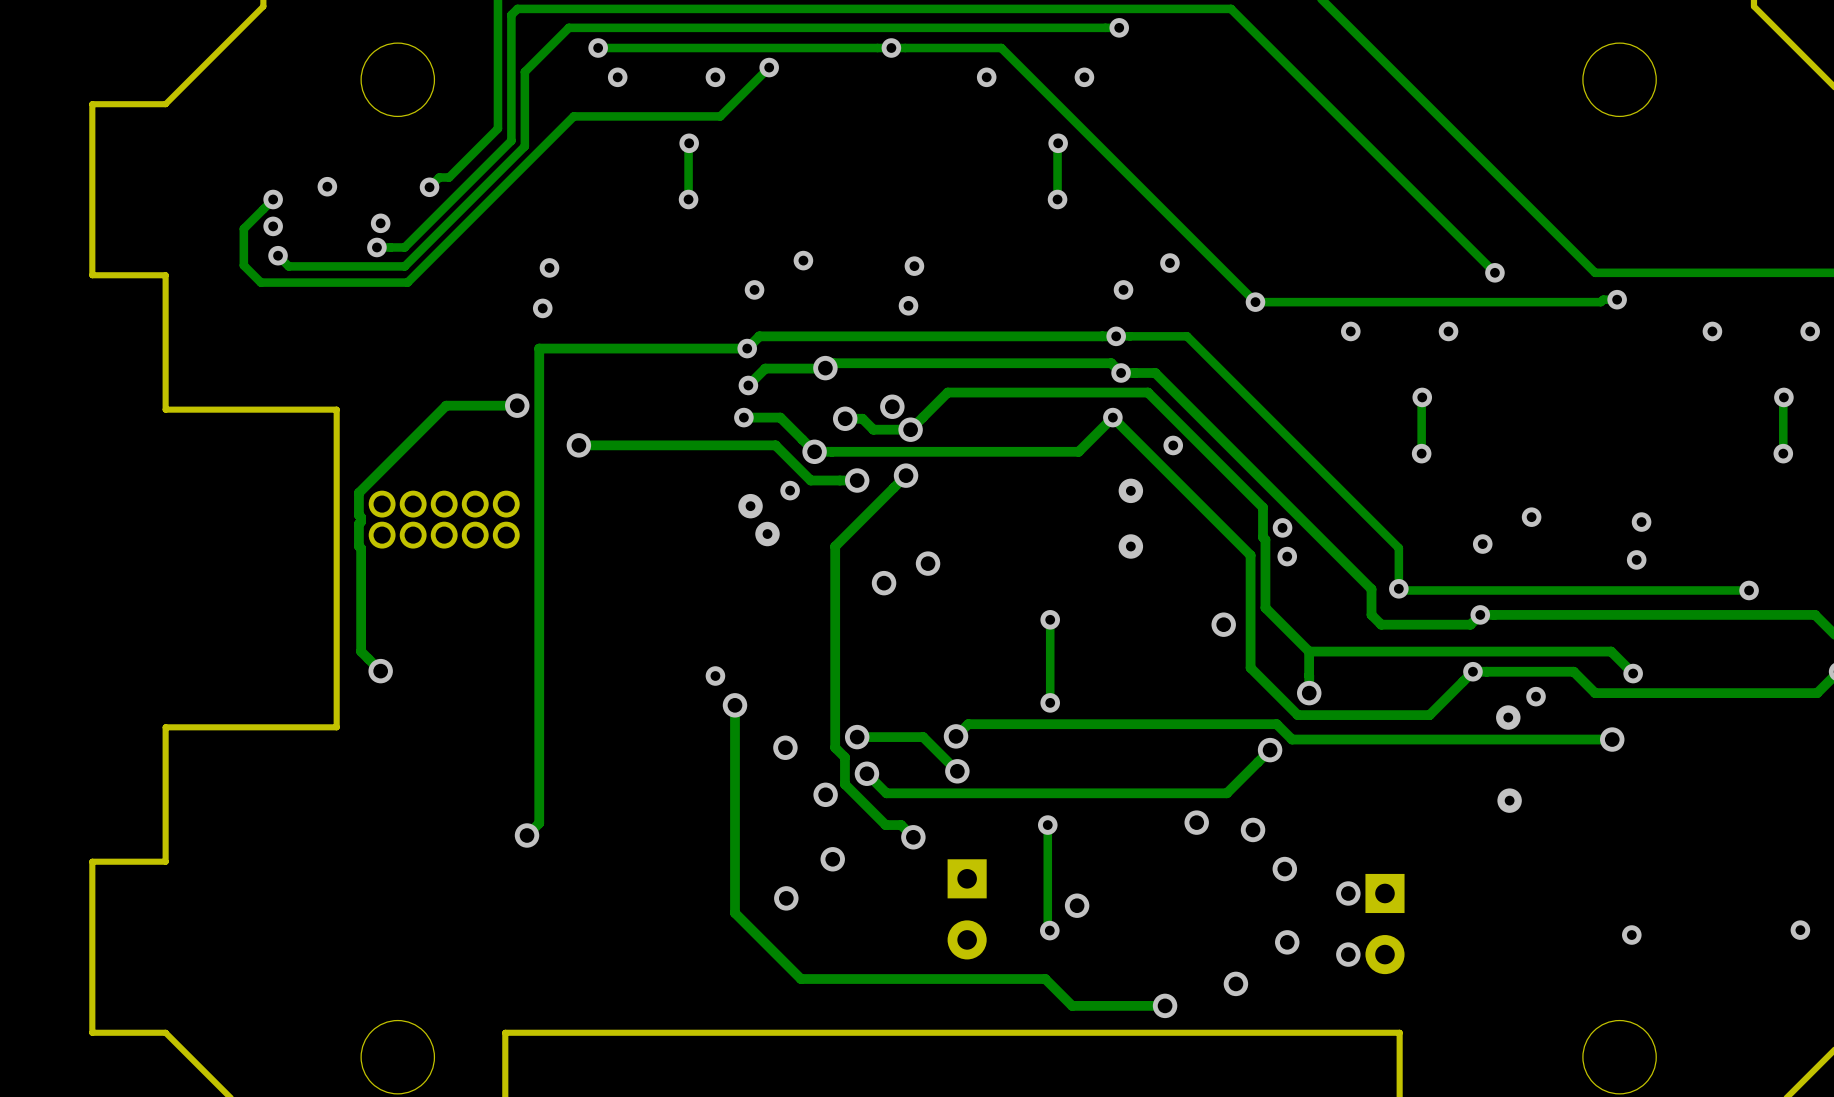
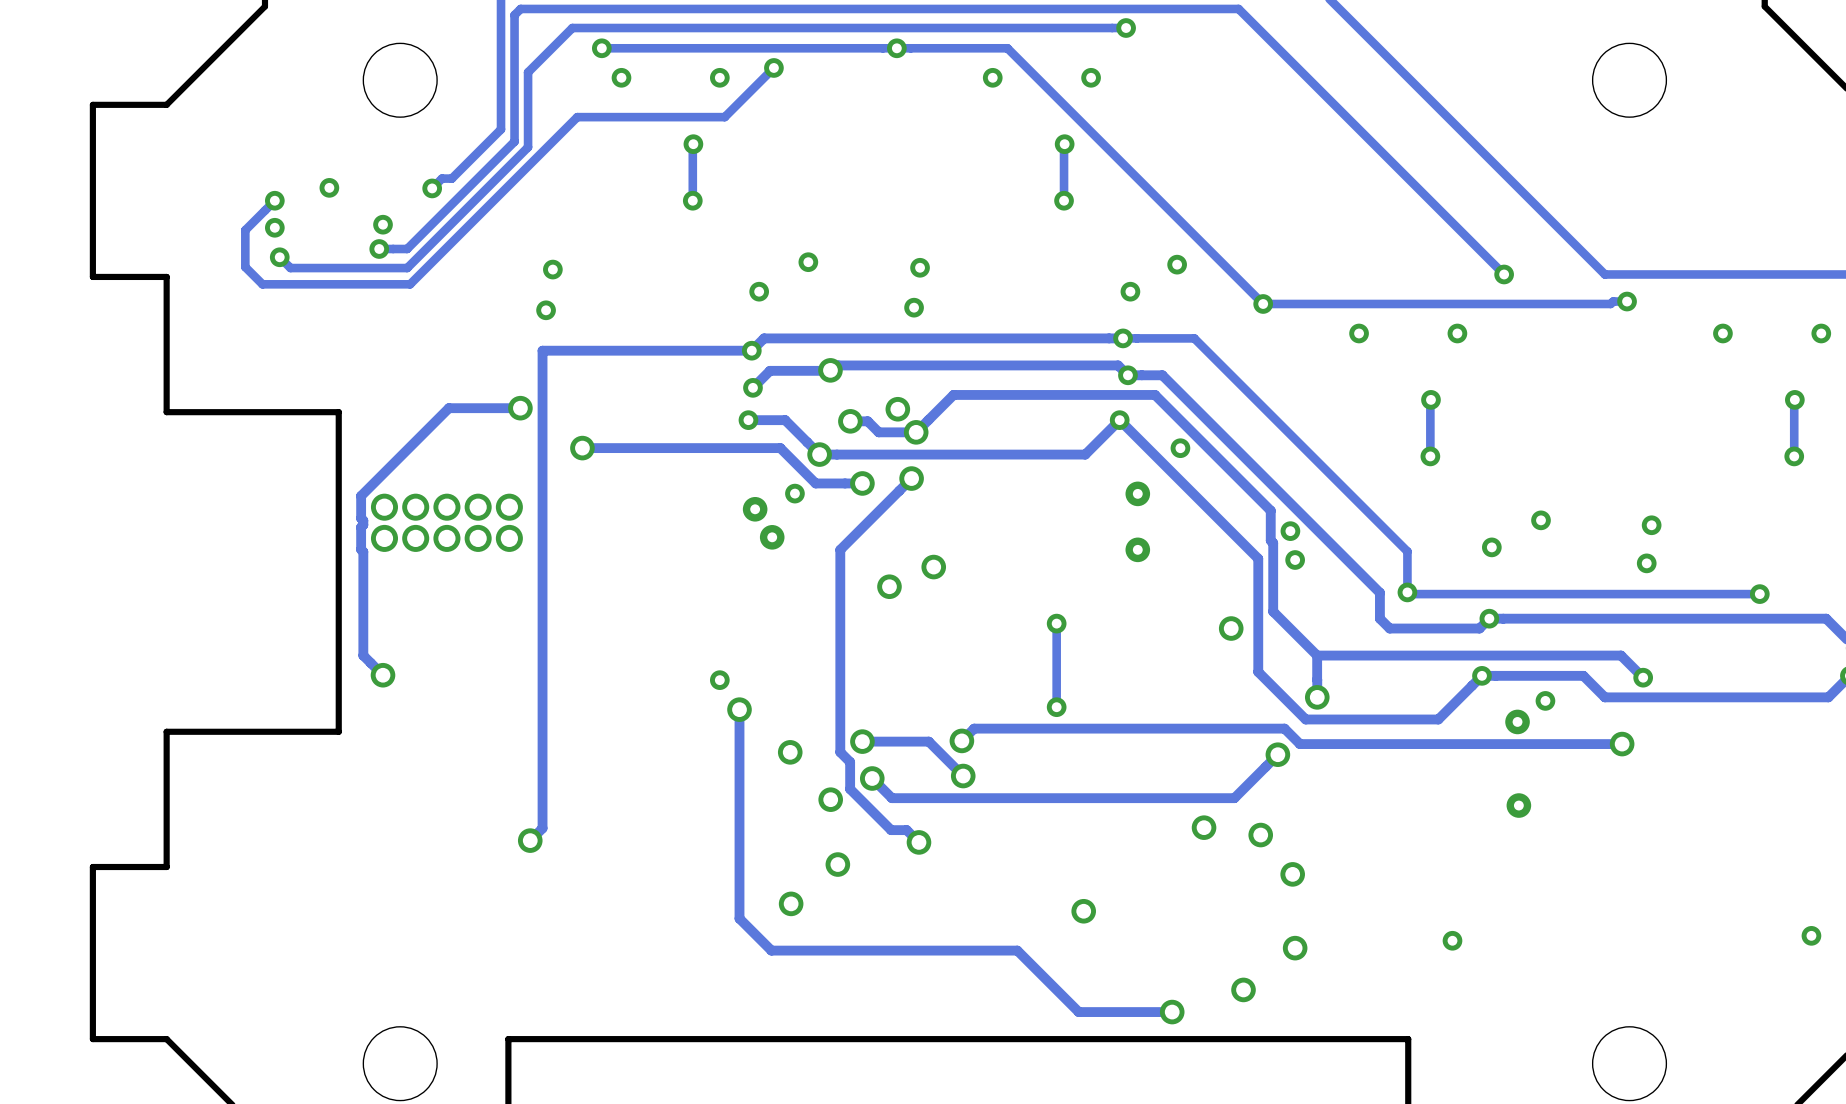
track: (1047, 825) (1047, 928) (1049, 930) -> none
via: (1047, 825) -> none
via: (1348, 893) -> none
part: (967, 909) -> none
part: (1384, 924) -> none
via: (1049, 930) -> none
via: none -> (1452, 940)
via: (1631, 935) -> none
track: (766, 944) (800, 979) (1045, 979) -> (771, 950) (1017, 950) (1051, 985)
via: (1348, 954) -> none

